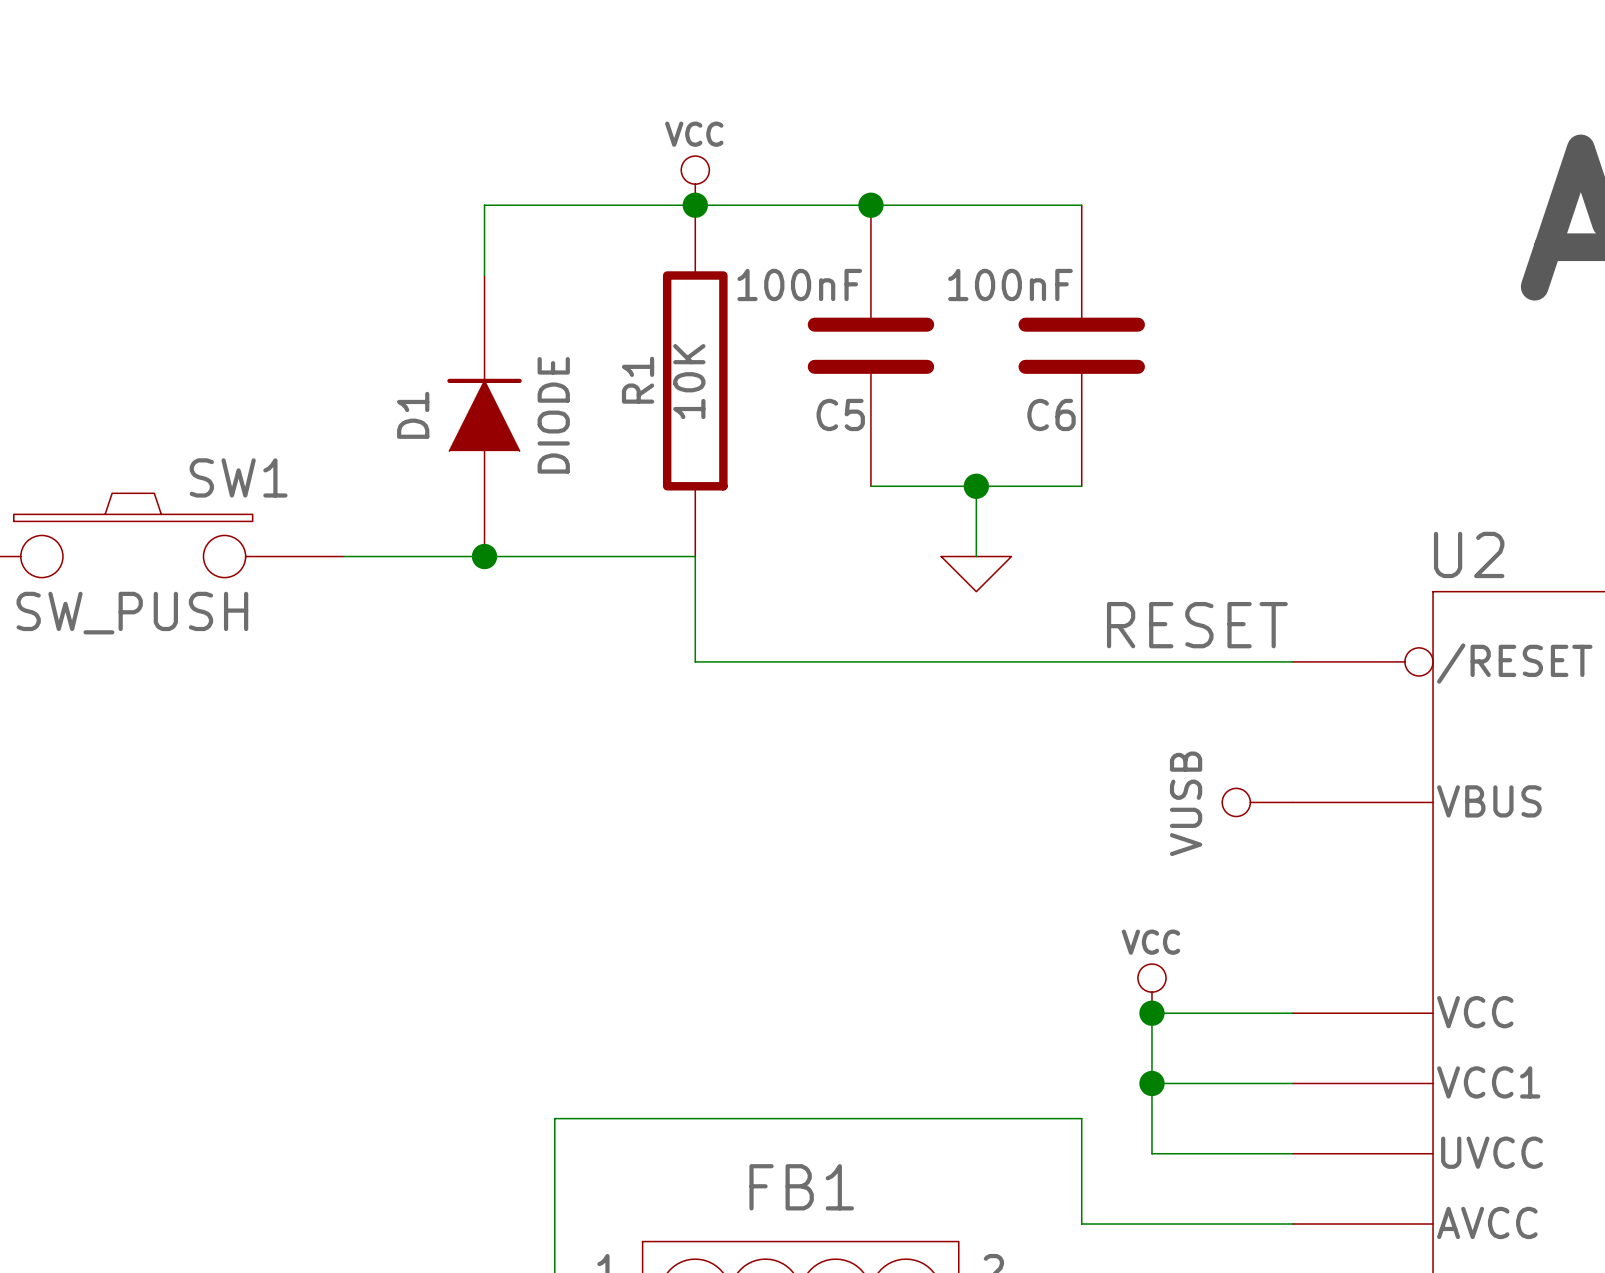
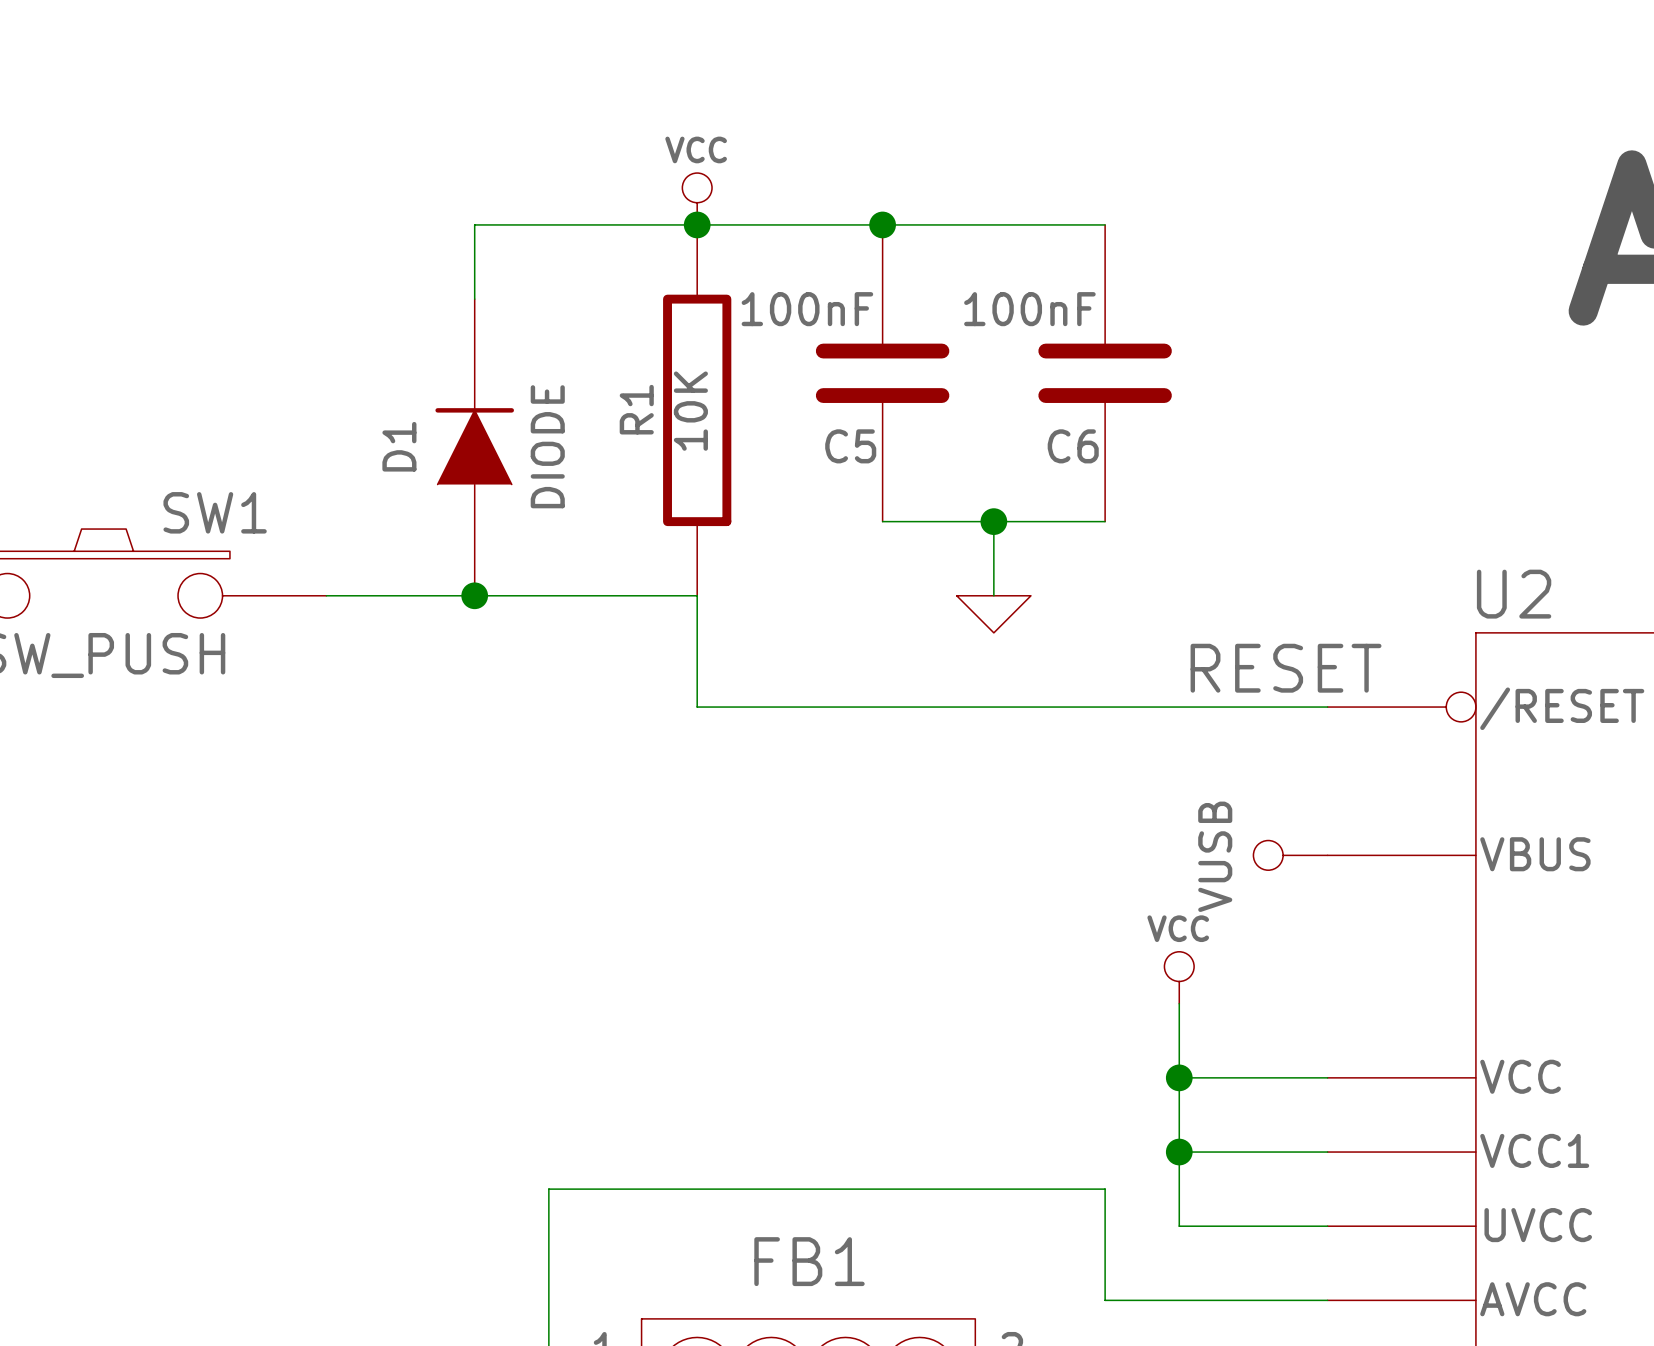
label position: RESET (1197, 625) -> RESET (1286, 668)
wire: none -> (1179, 1003) (1179, 1077)
power symbol position: VCC (1151, 988) -> VCC (1179, 977)

